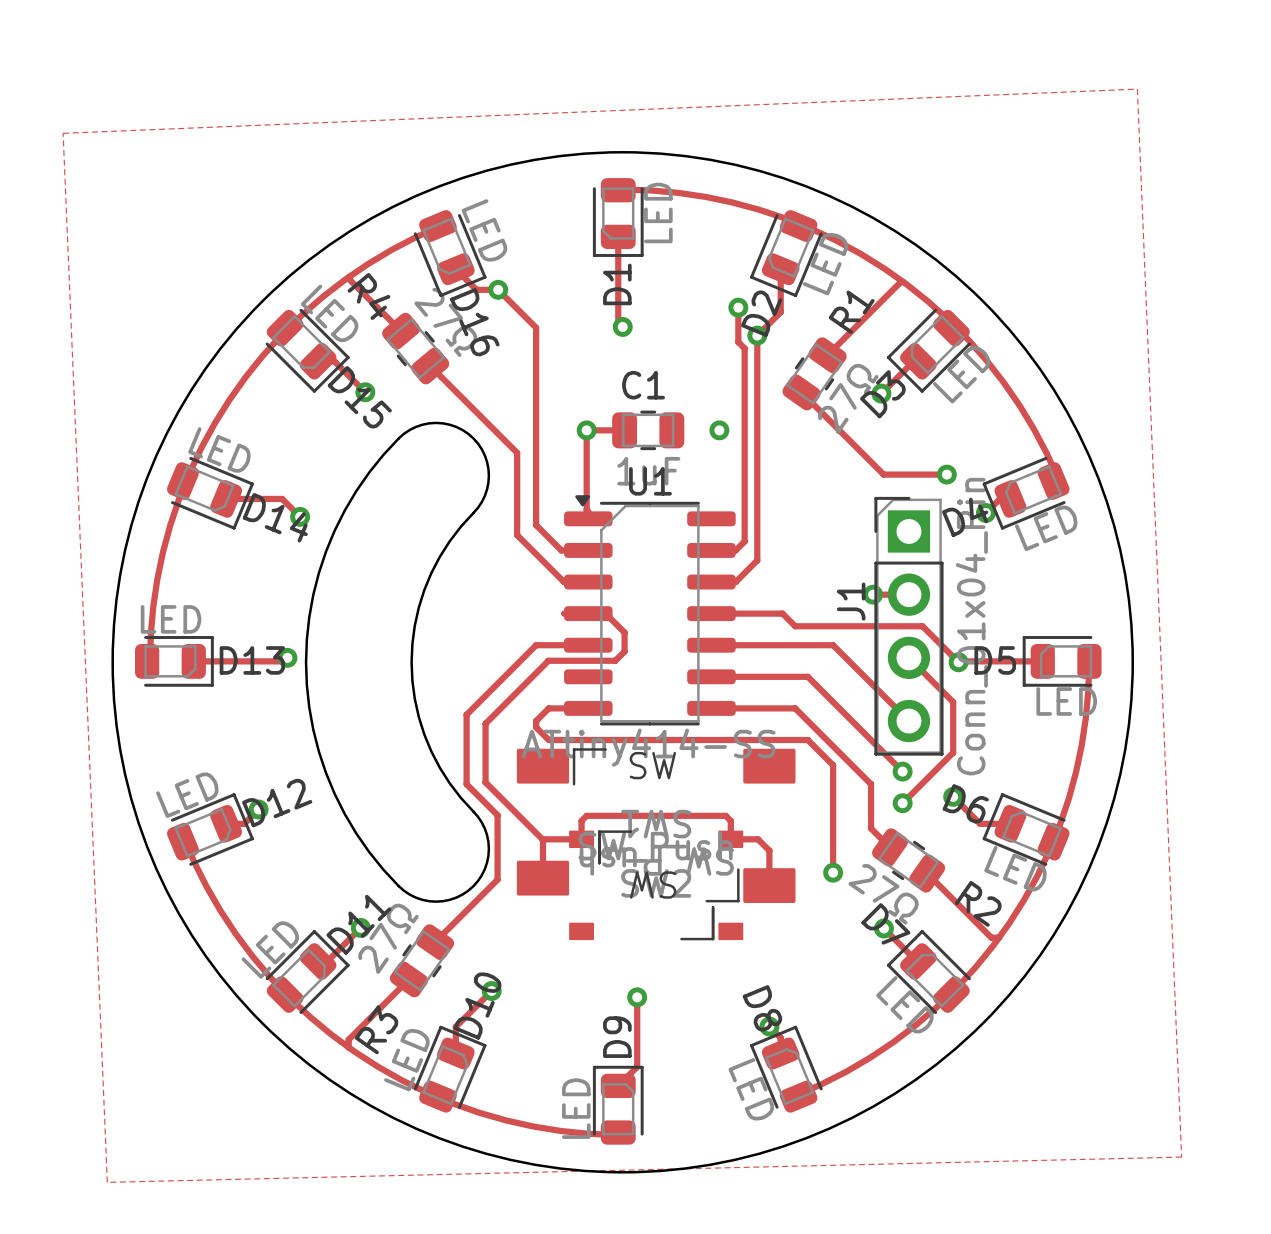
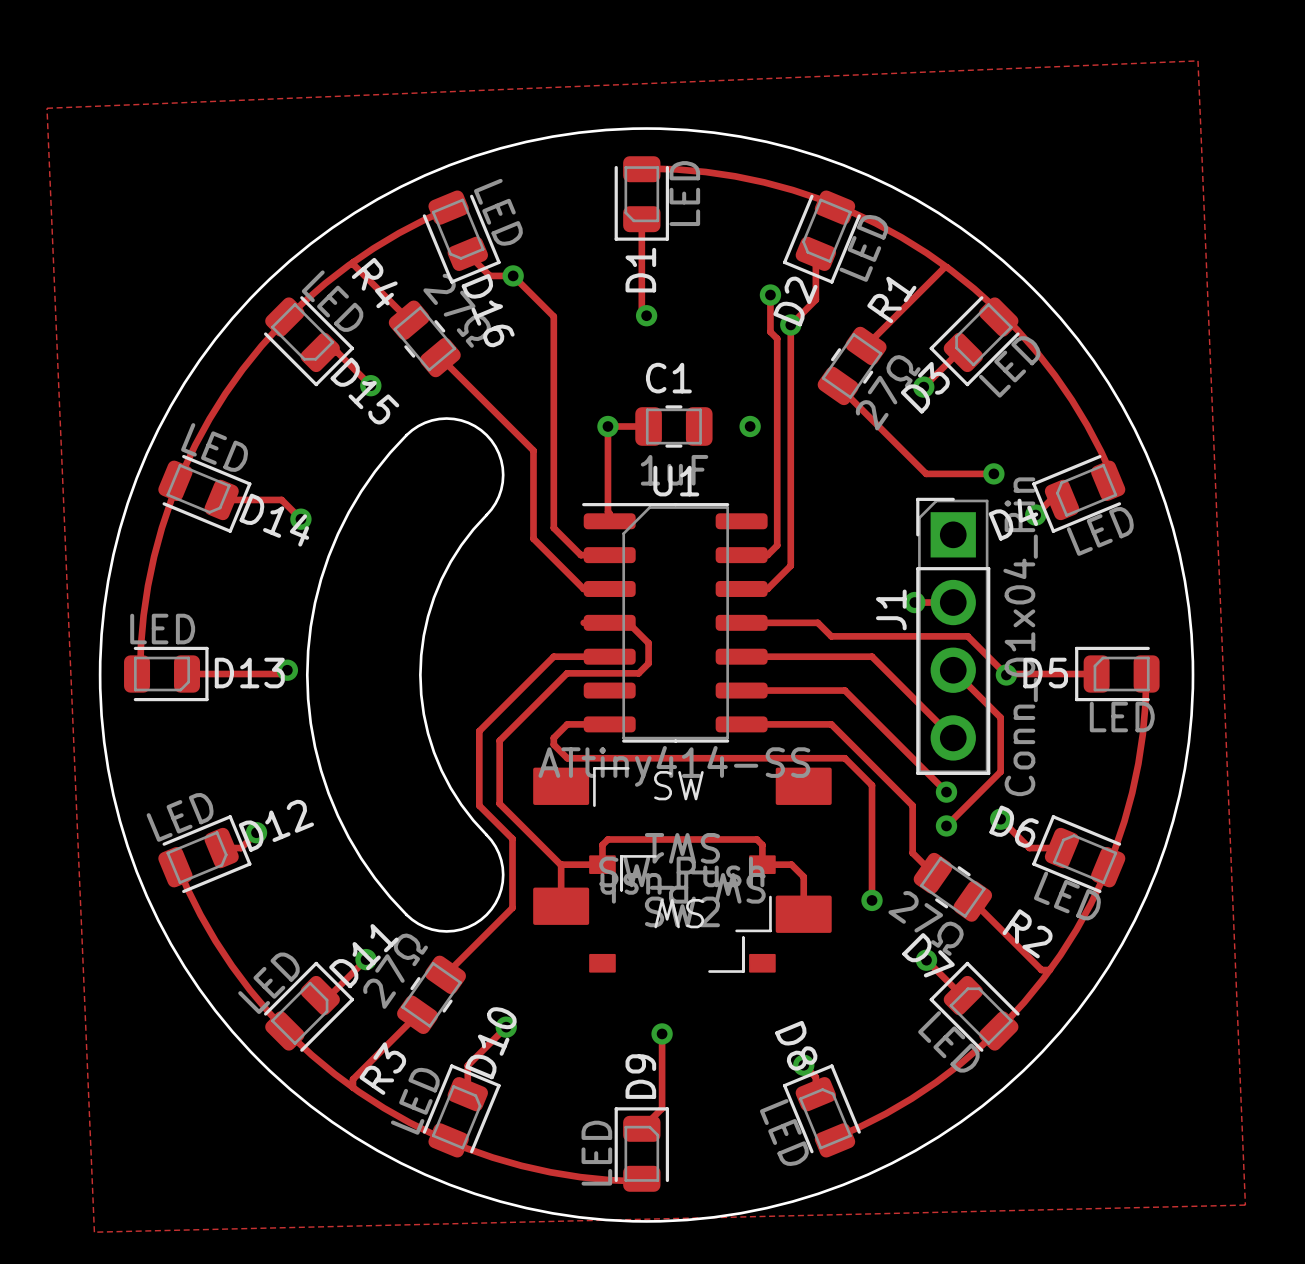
U1 footprint: [564, 495, 736, 726] -> [582, 503, 768, 743]

